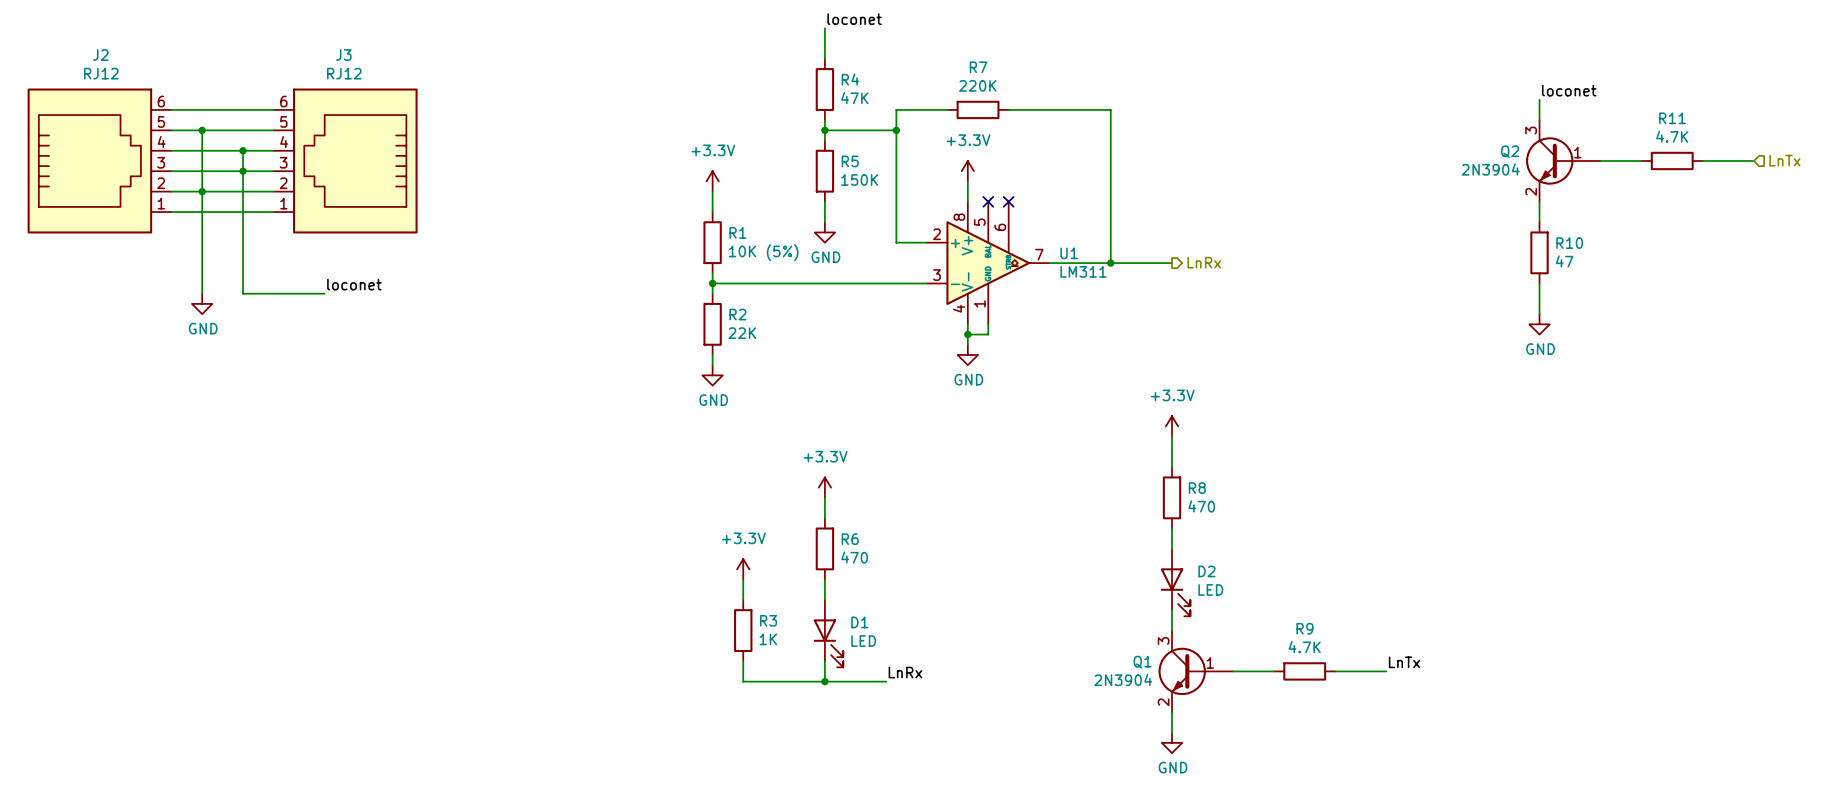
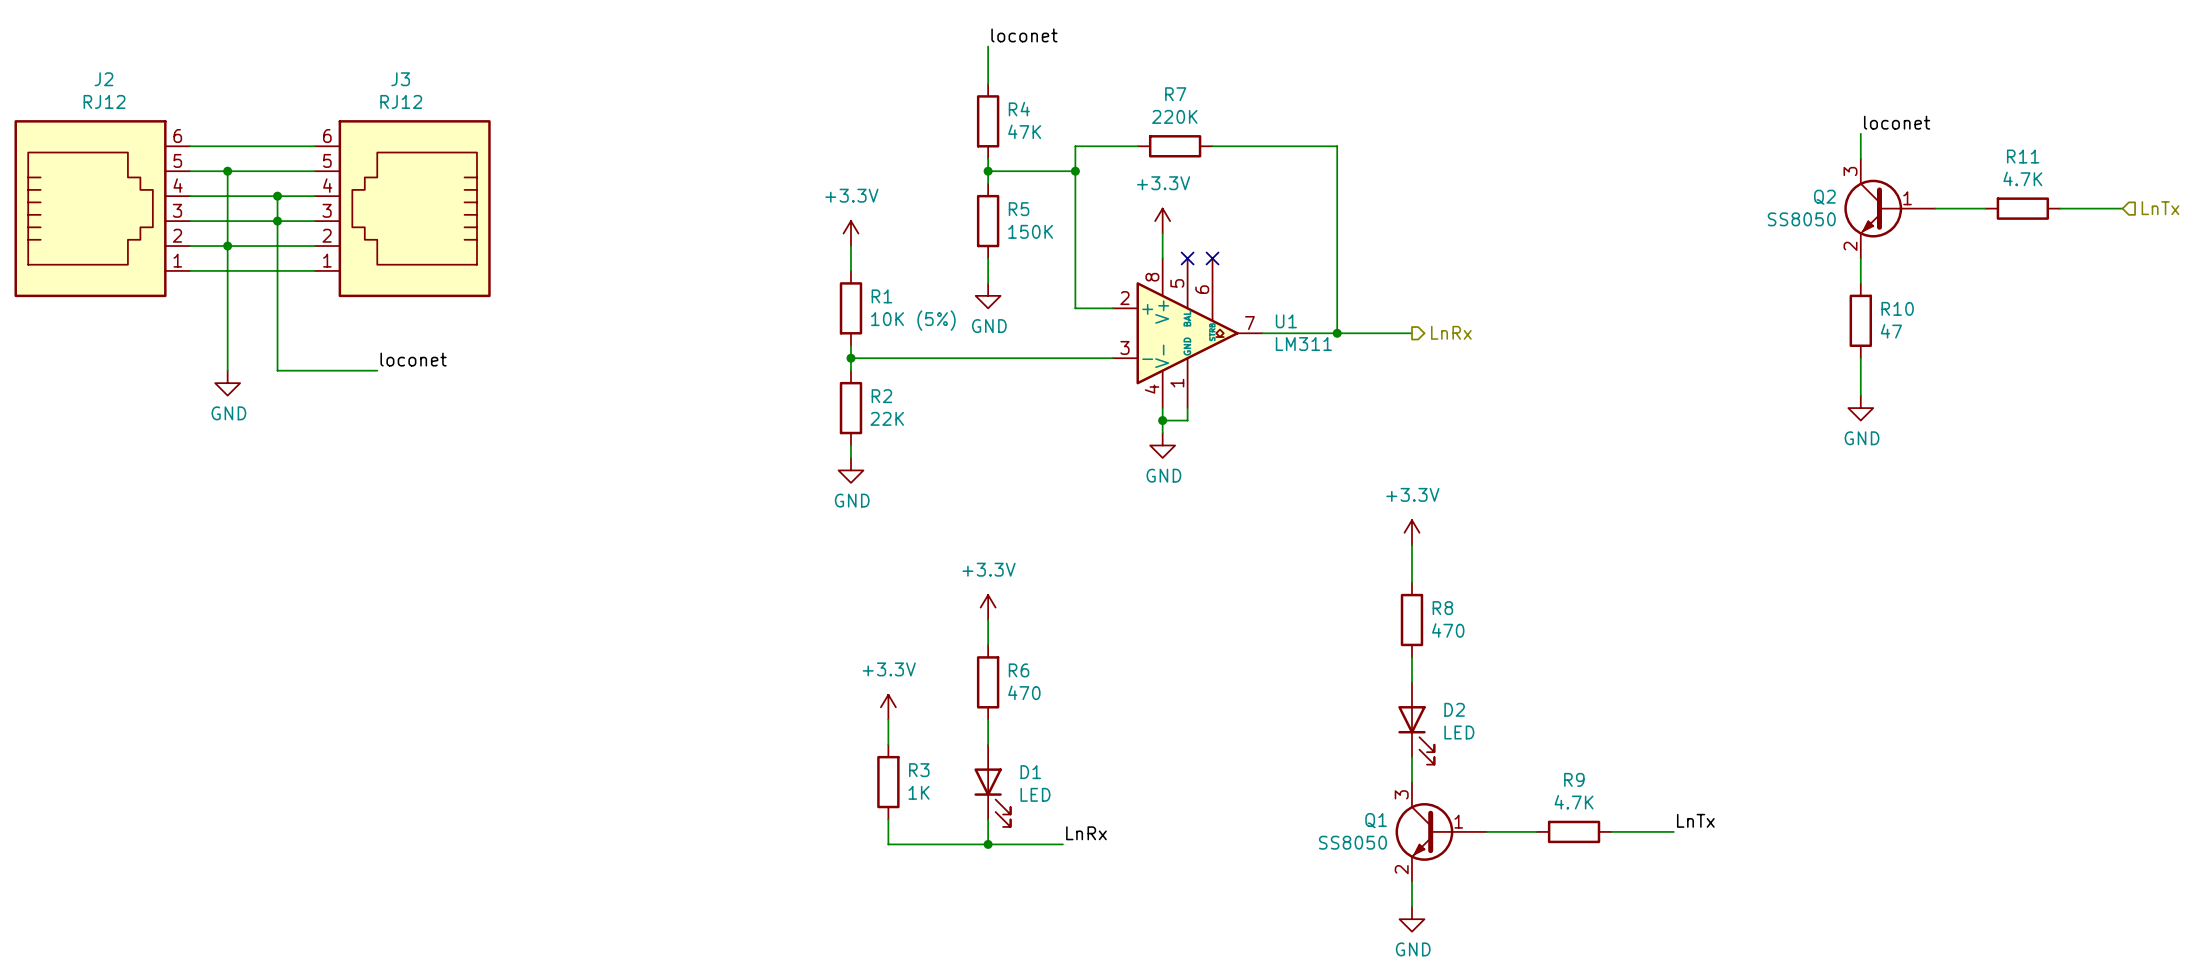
Q2 value: 2N3904 (1490, 169) -> SS8050 (1801, 219)
Q1 value: 2N3904 (1123, 679) -> SS8050 (1352, 842)

